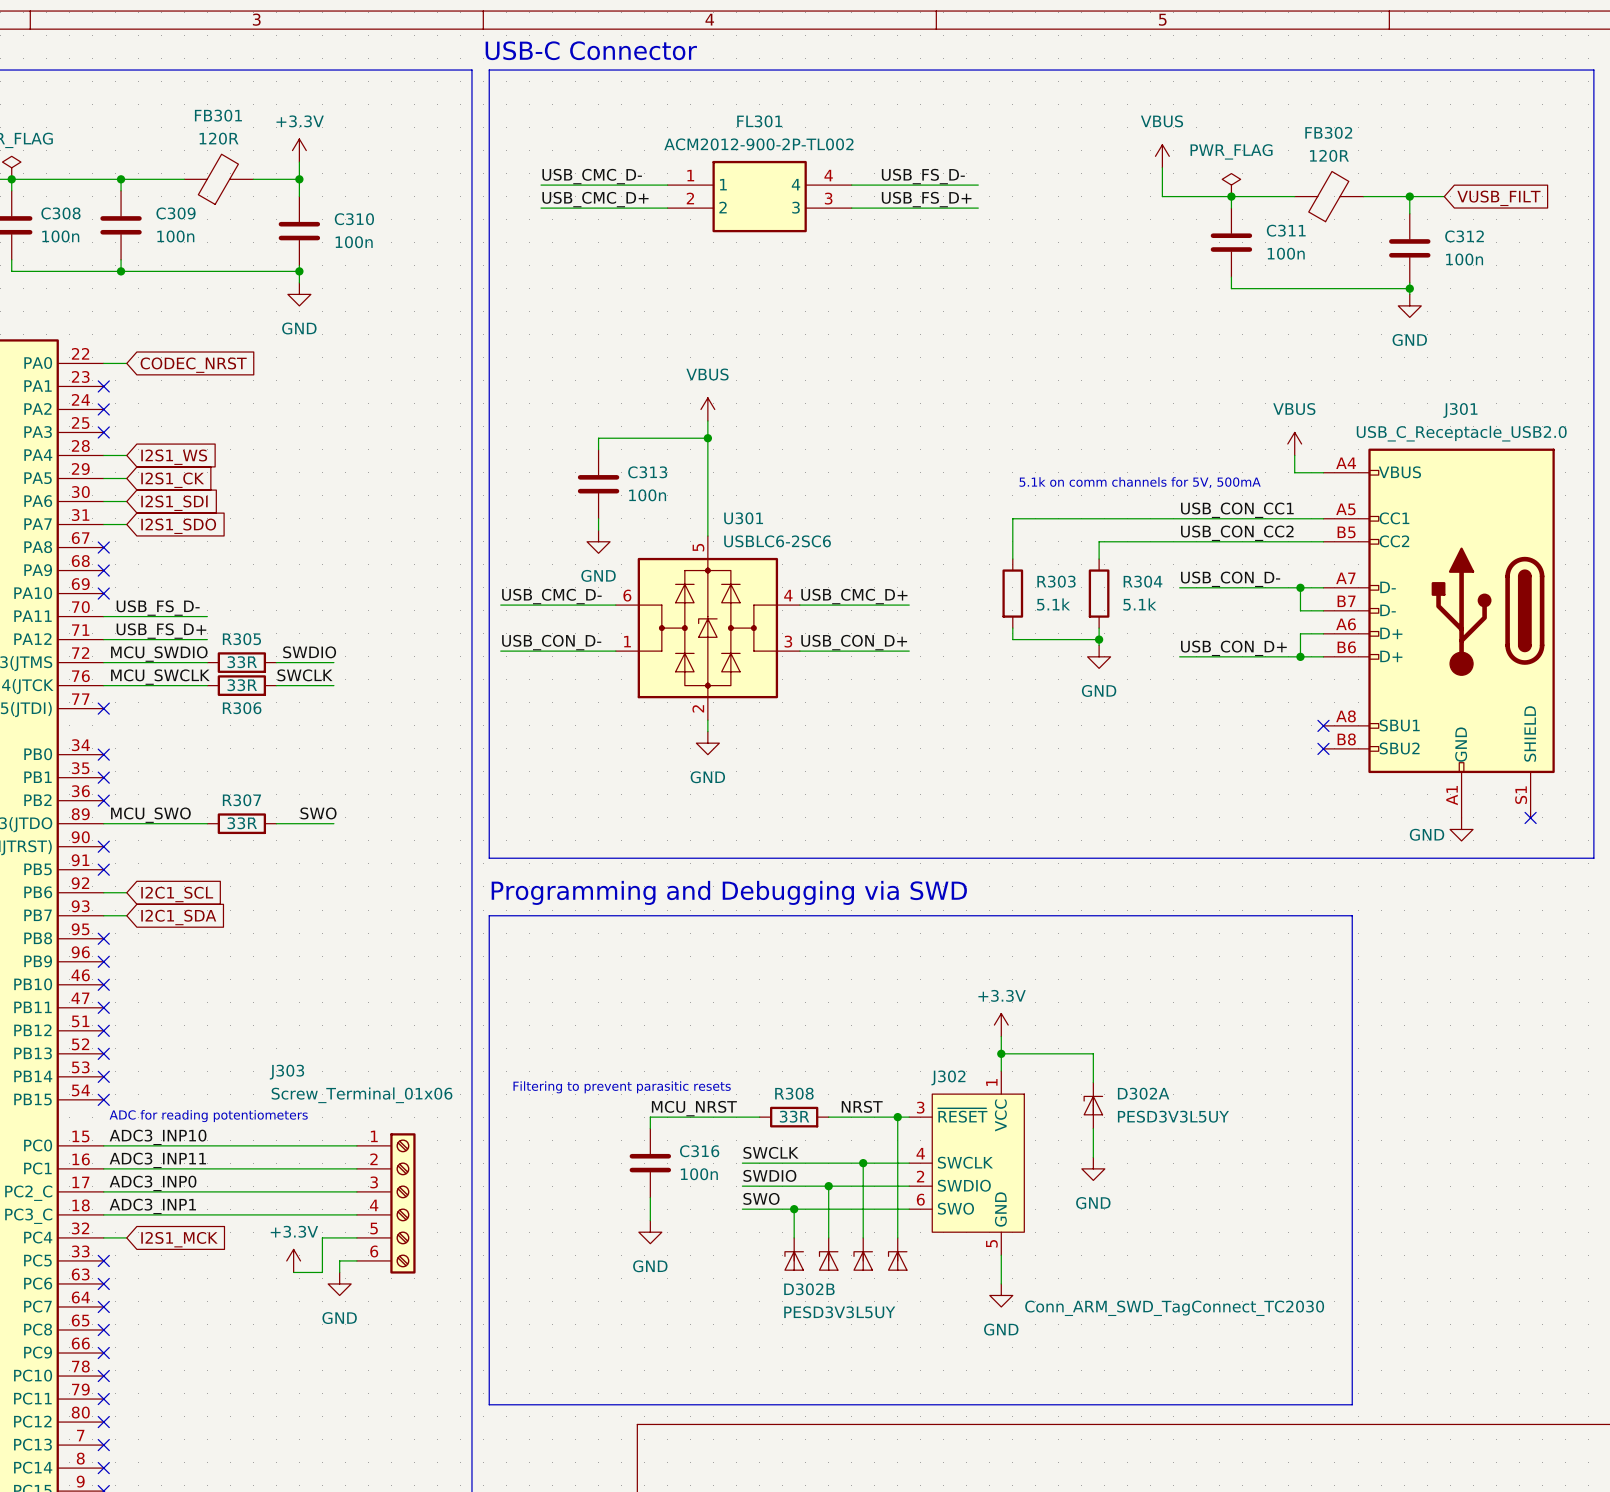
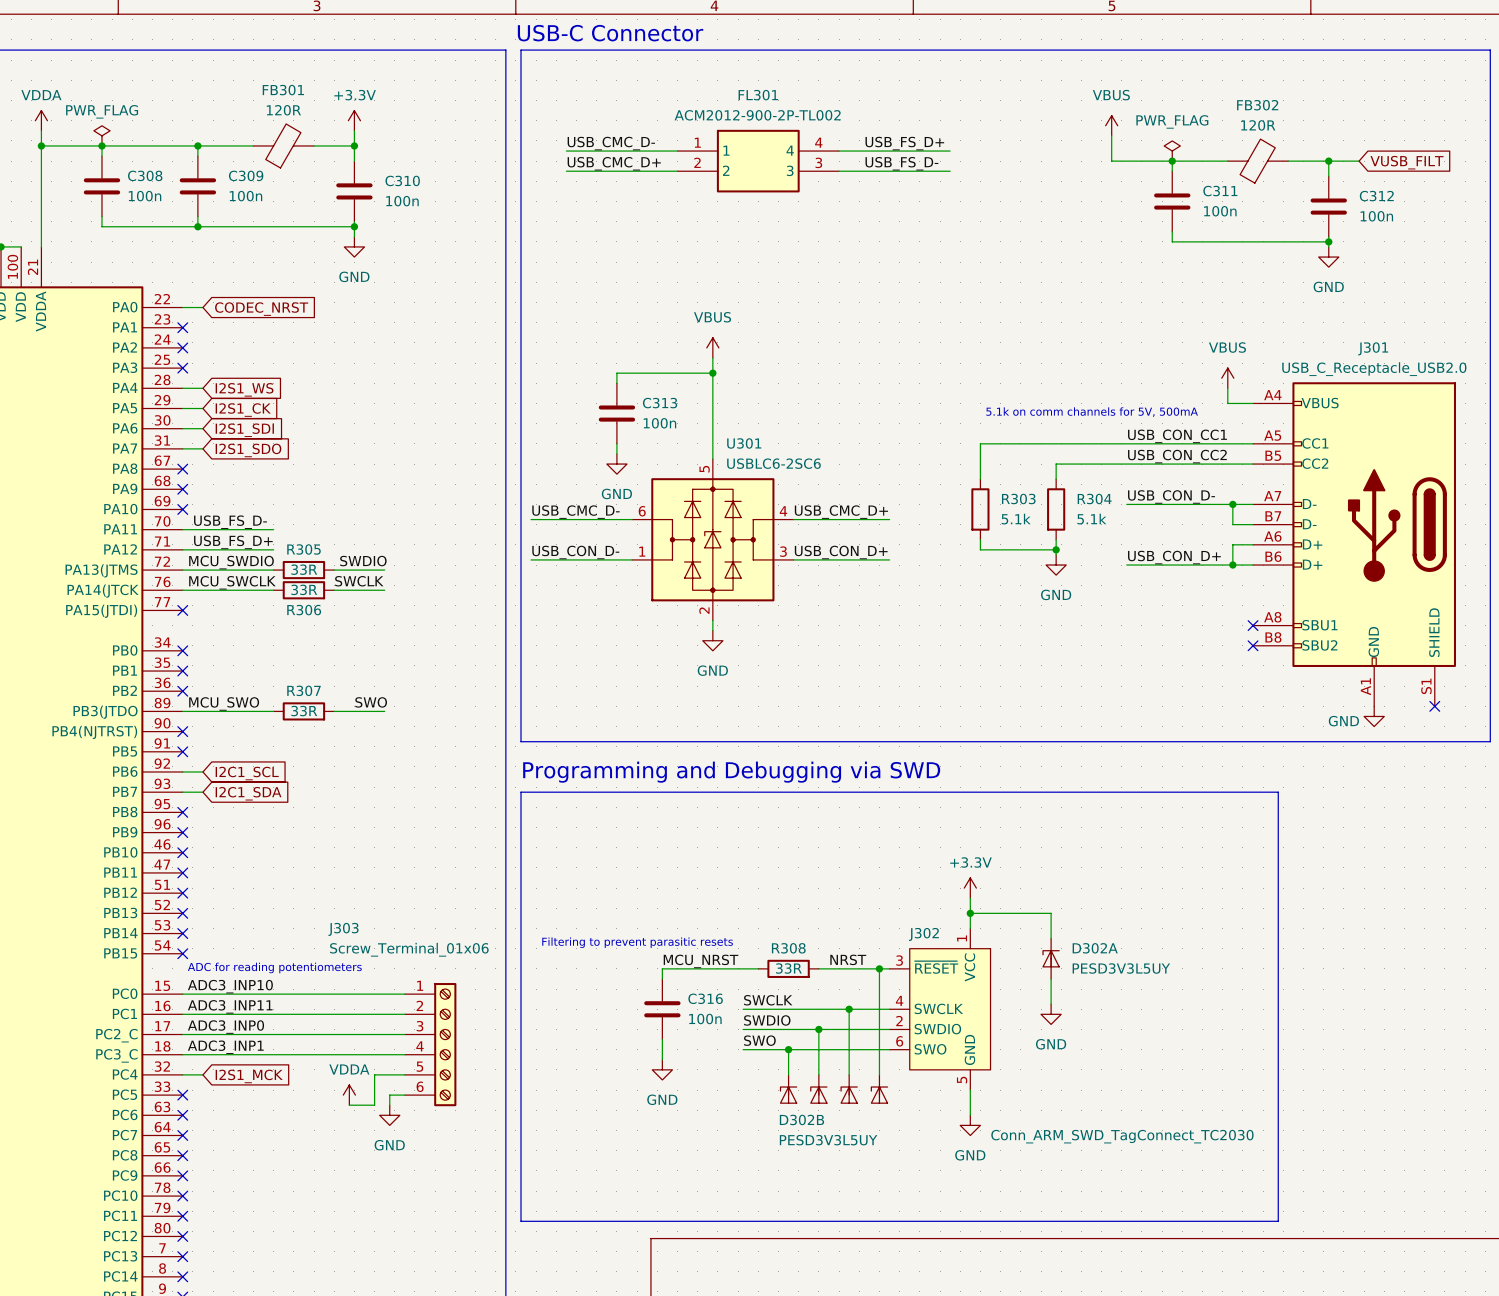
label: USB_FS_D- (923, 176) -> USB_FS_D+ (904, 143)
label: USB_FS_D+ (926, 199) -> USB_FS_D- (901, 163)
power symbol: +3.3V (293, 1260) -> VDDA (349, 1095)

